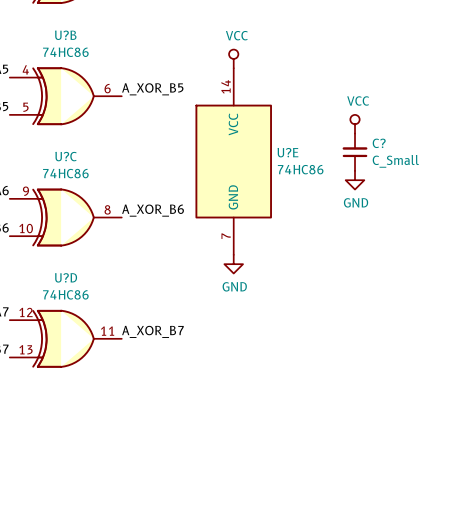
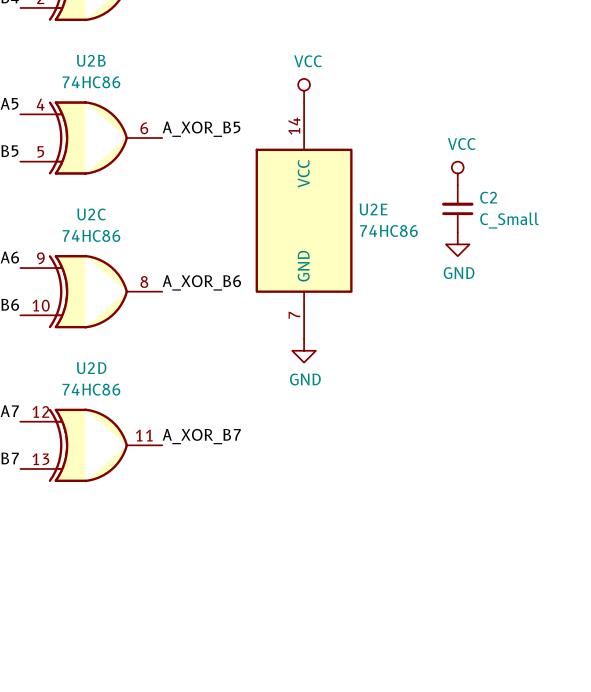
U?B name: U?B (65, 35) -> U2B (91, 60)
C? name: C? (379, 143) -> C2 (488, 197)
U?E name: U?E (287, 152) -> U2E (373, 209)
U?C name: U?C (65, 156) -> U2C (91, 214)
U?D name: U?D (66, 277) -> U2D (91, 368)

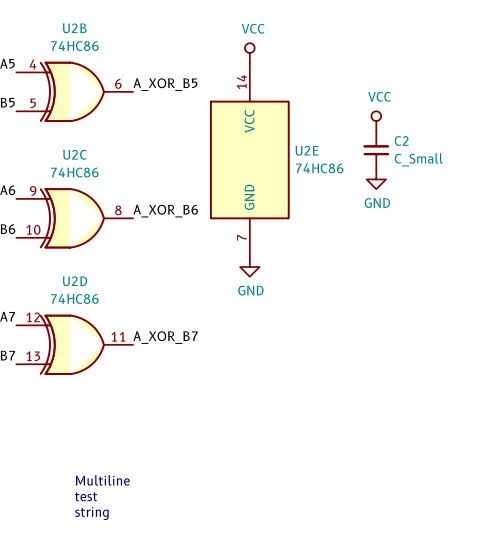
text: none -> Multiline (102, 480)
text: none -> test (86, 496)
text: none -> string (91, 513)

